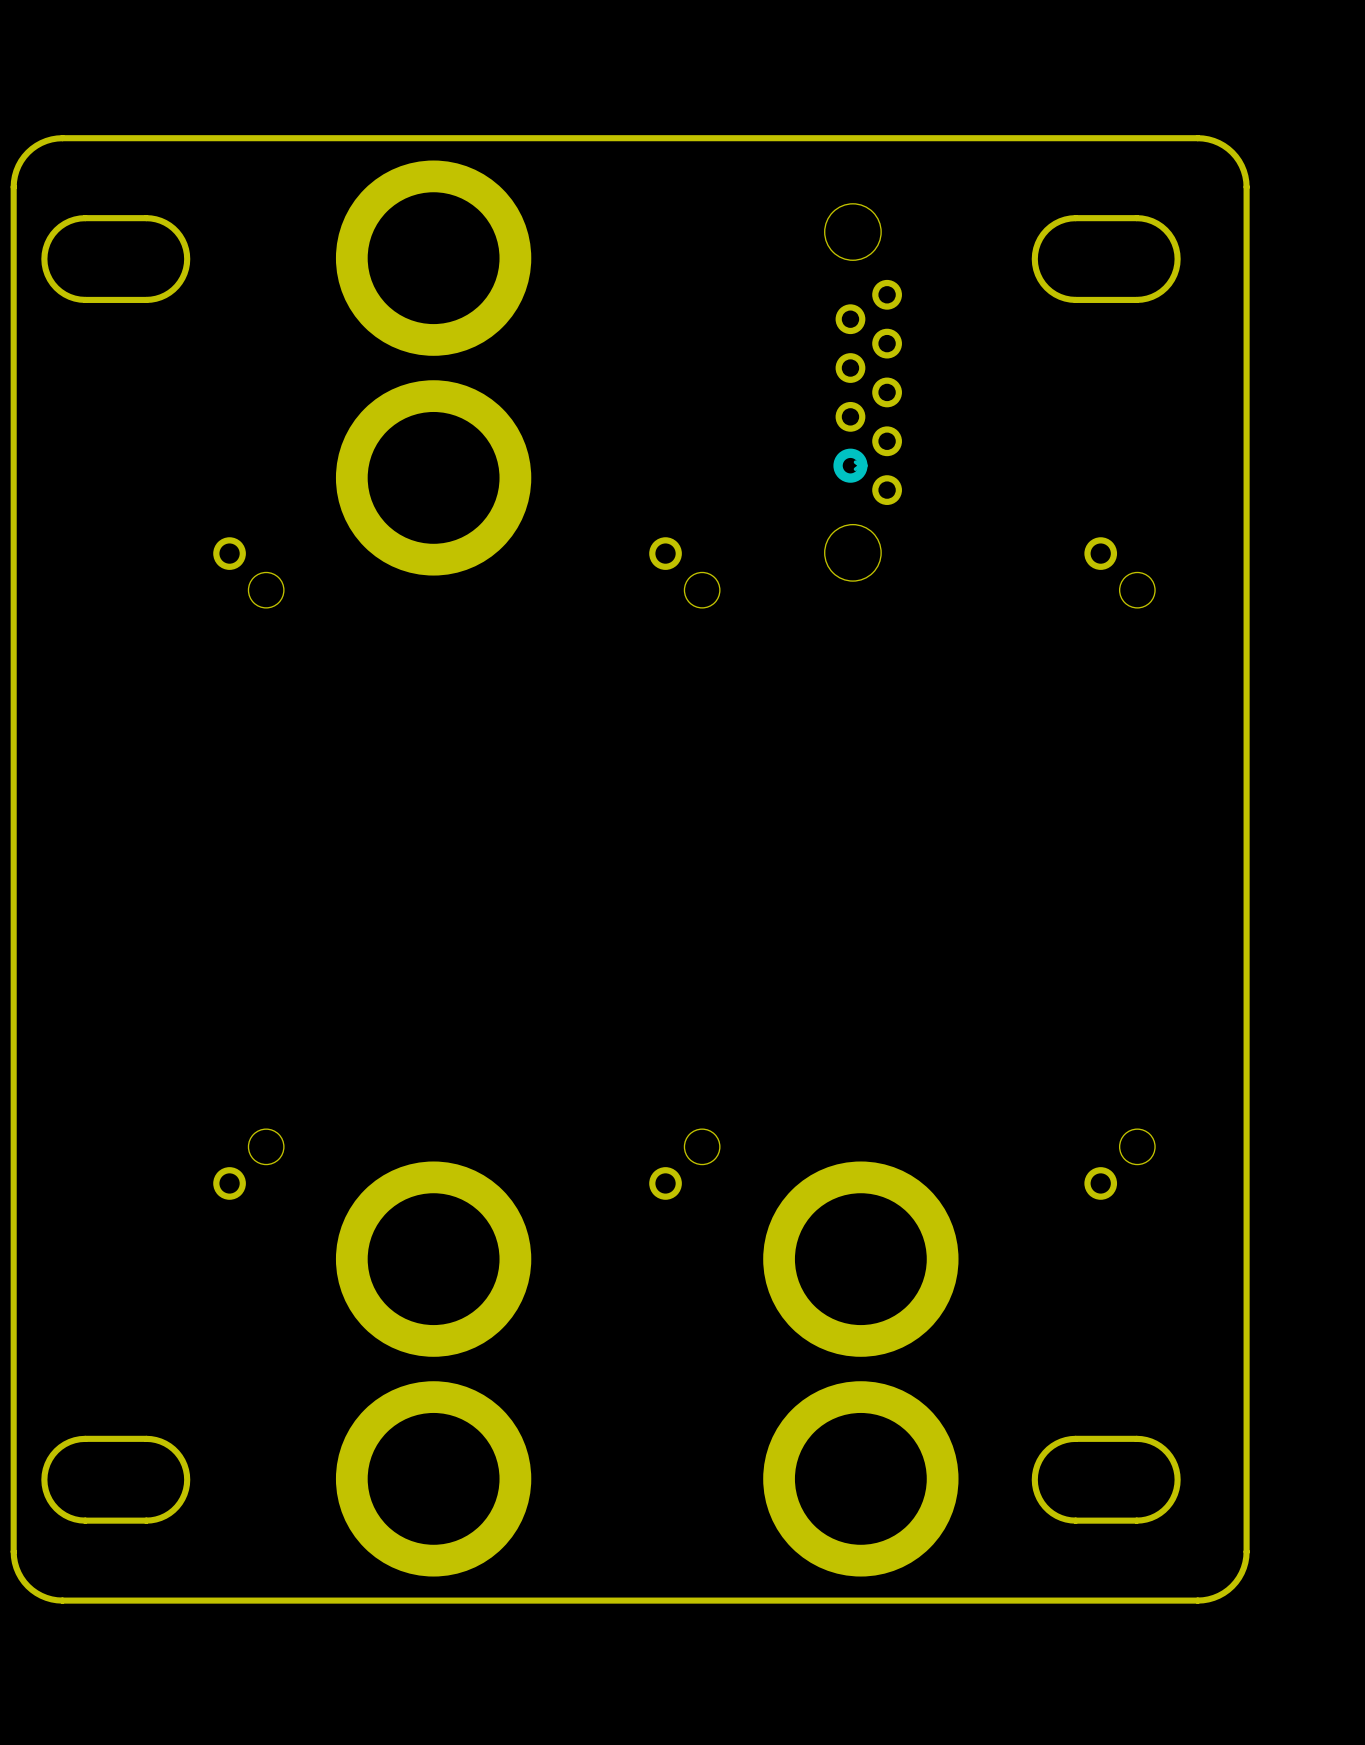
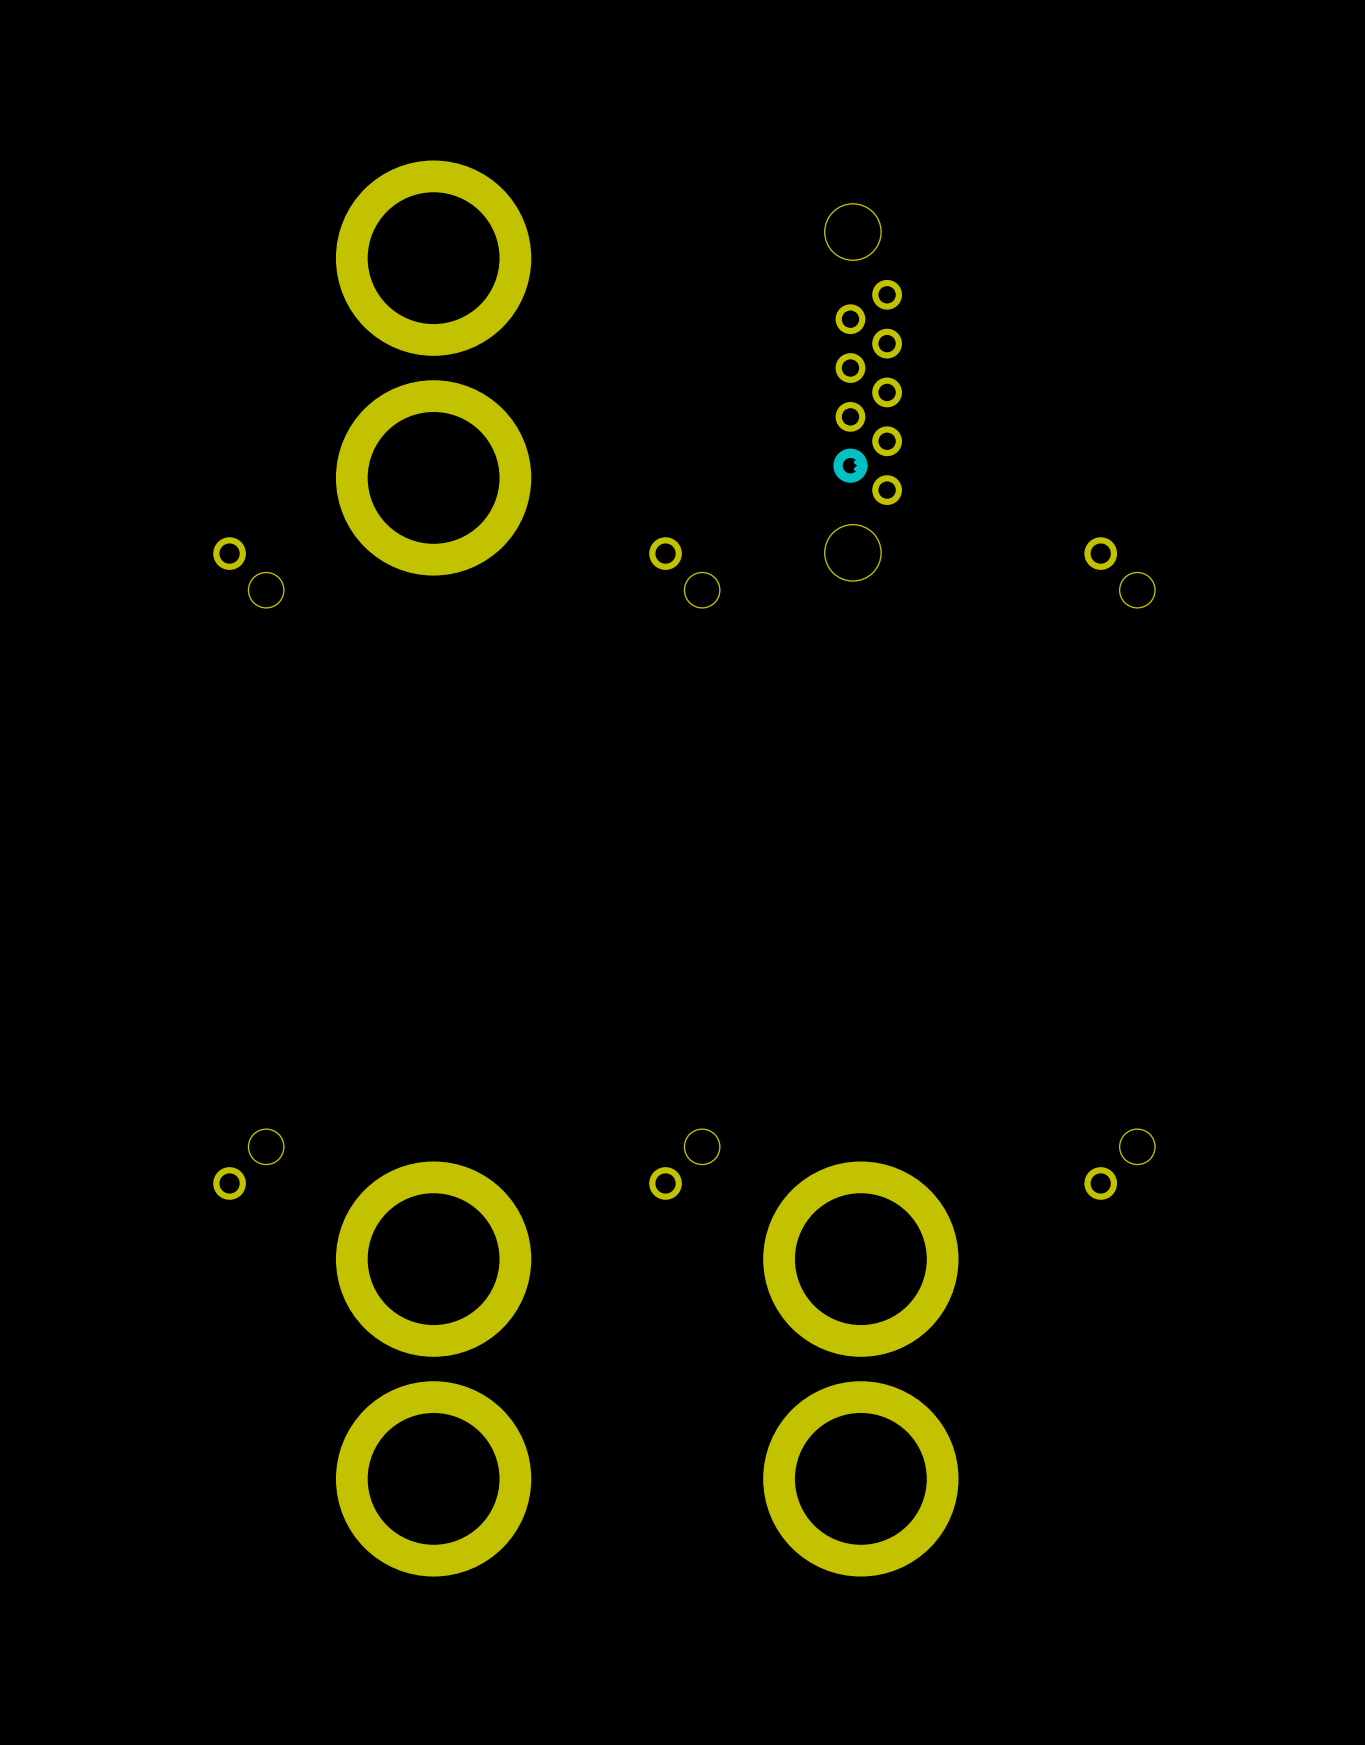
board edge: (1197, 138) (62, 138) (41, 143) (24, 156) (16, 170) (13, 187) (13, 1551) (18, 1572) (32, 1589) (46, 1597) (62, 1600) (1197, 1600) (1218, 1595) (1235, 1582) (1243, 1567) (1246, 1551) (1246, 187) (1243, 170) (1232, 152) (1218, 143) (1197, 138) -> none
board edge: (146, 218) (79, 218) (60, 226) (49, 238) (44, 253) (45, 269) (52, 283) (64, 294) (79, 299) (151, 299) (169, 292) (179, 282) (184, 273) (187, 259) (184, 244) (179, 235) (169, 225) (156, 219) (146, 218) -> none
board edge: (1136, 218) (1070, 218) (1050, 226) (1040, 238) (1035, 253) (1036, 269) (1043, 283) (1055, 294) (1075, 299) (1142, 299) (1161, 291) (1174, 274) (1177, 259) (1176, 248) (1169, 234) (1161, 226) (1152, 221) (1136, 218) -> none
board edge: (146, 1438) (79, 1439) (60, 1447) (49, 1459) (44, 1474) (45, 1490) (52, 1504) (64, 1515) (79, 1520) (151, 1520) (169, 1513) (176, 1506) (184, 1494) (187, 1479) (186, 1469) (182, 1460) (173, 1449) (160, 1441) (146, 1438) -> none
board edge: (1136, 1438) (1070, 1439) (1052, 1446) (1042, 1456) (1035, 1469) (1035, 1484) (1042, 1502) (1056, 1515) (1070, 1520) (1141, 1520) (1159, 1513) (1170, 1502) (1174, 1494) (1177, 1484) (1176, 1469) (1170, 1456) (1159, 1446) (1146, 1440) (1136, 1438) -> none

